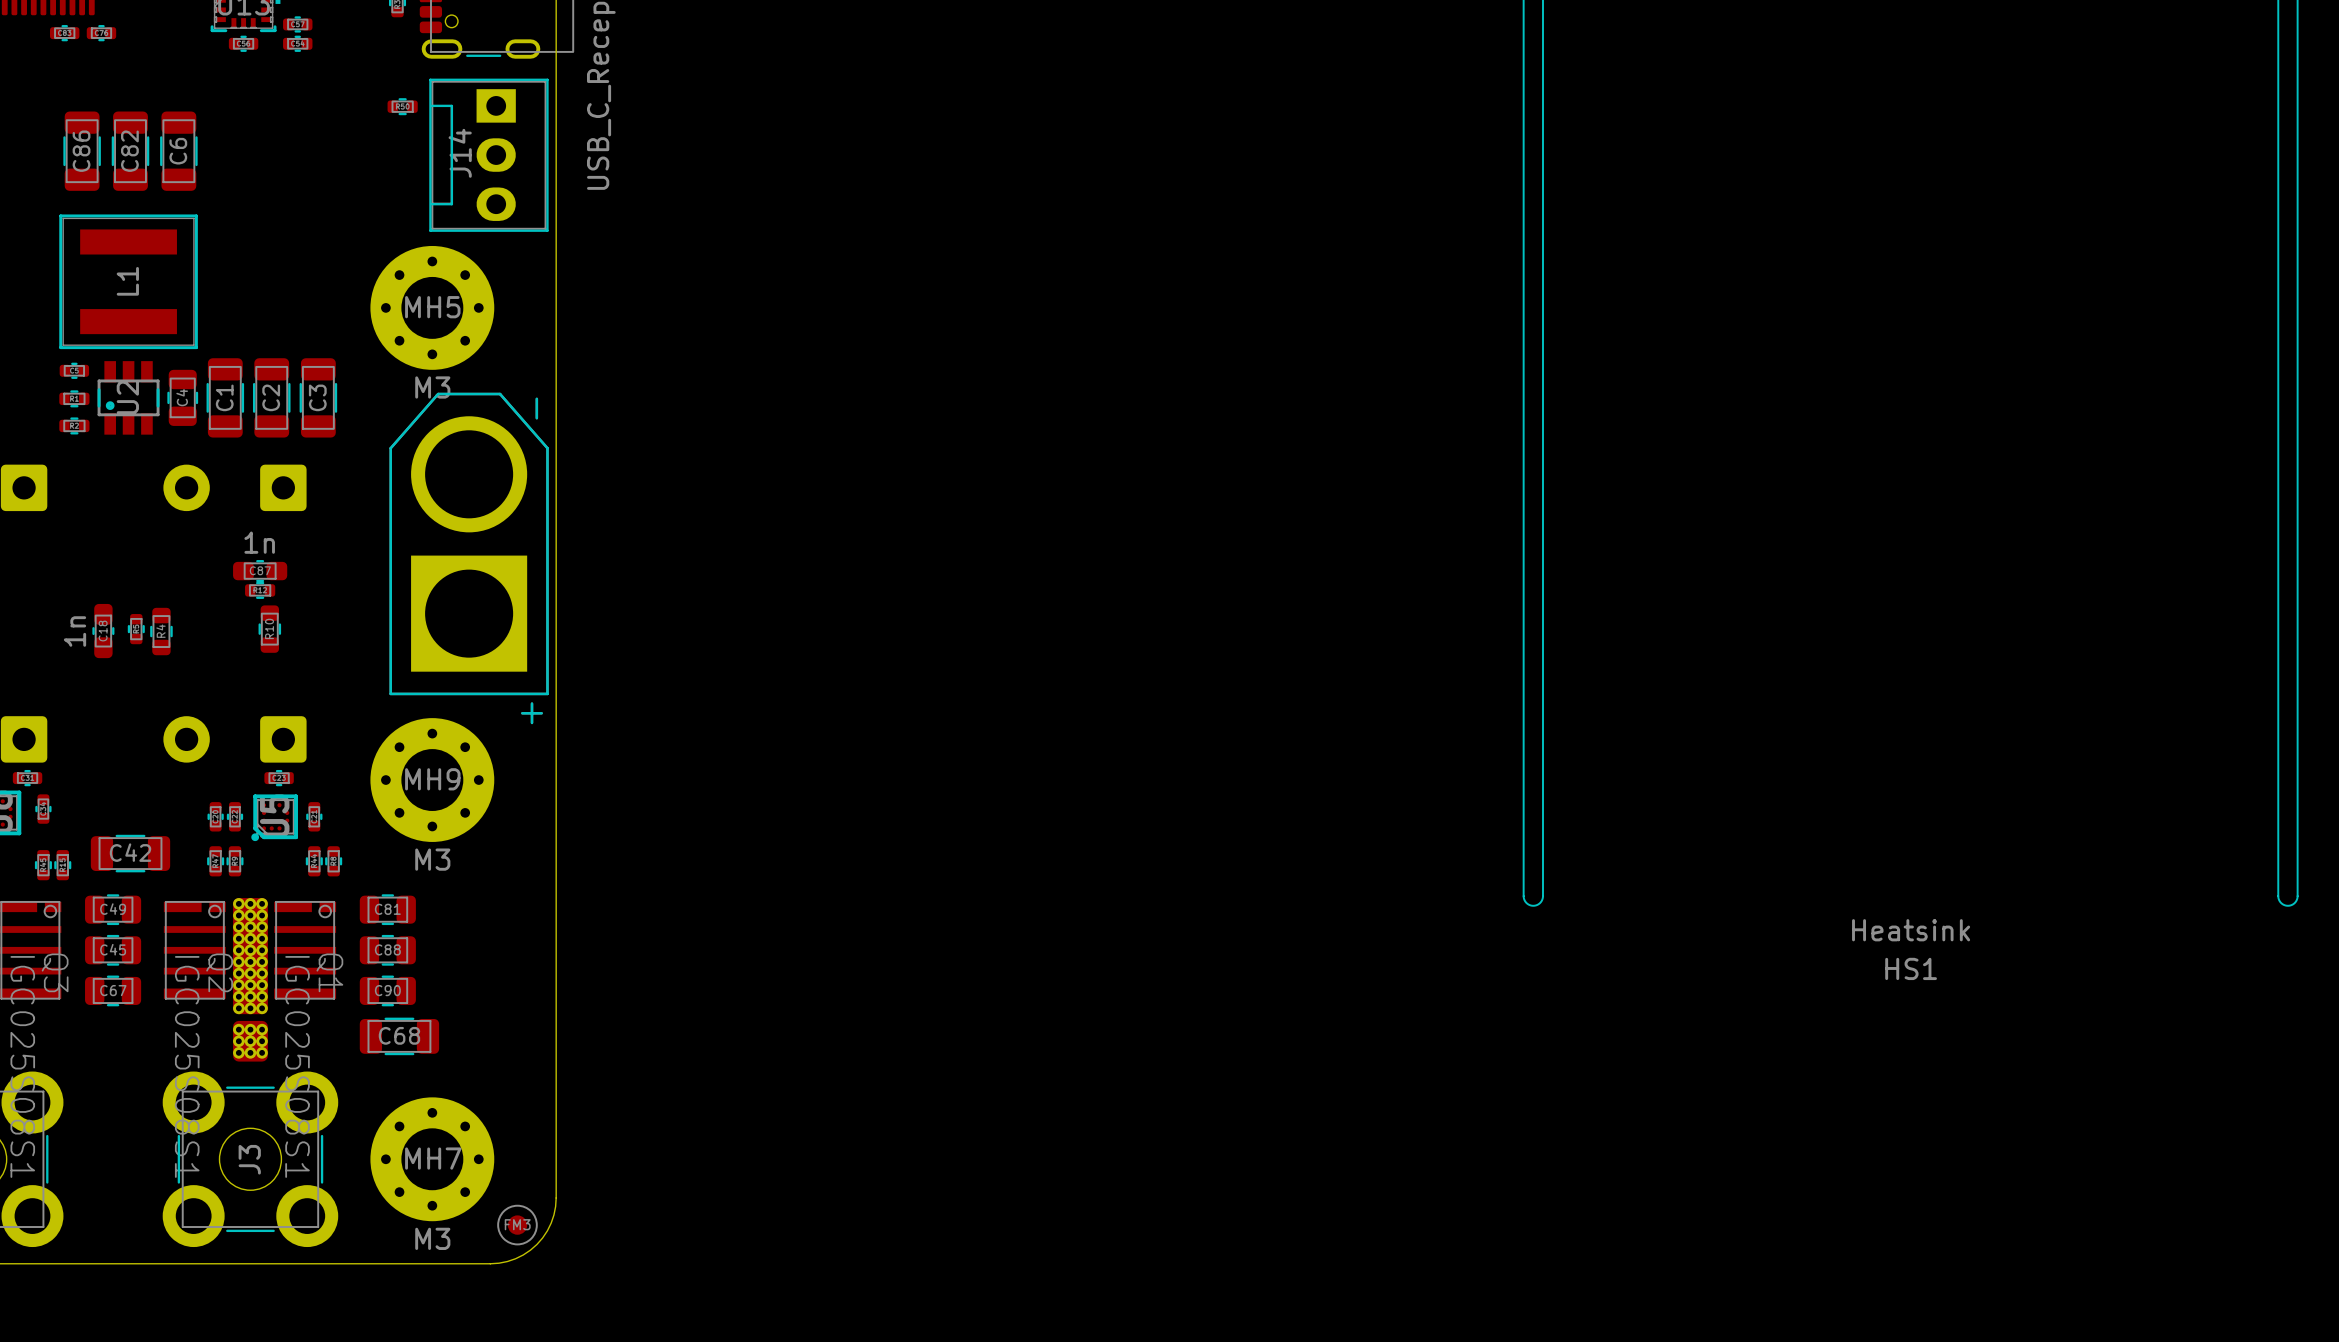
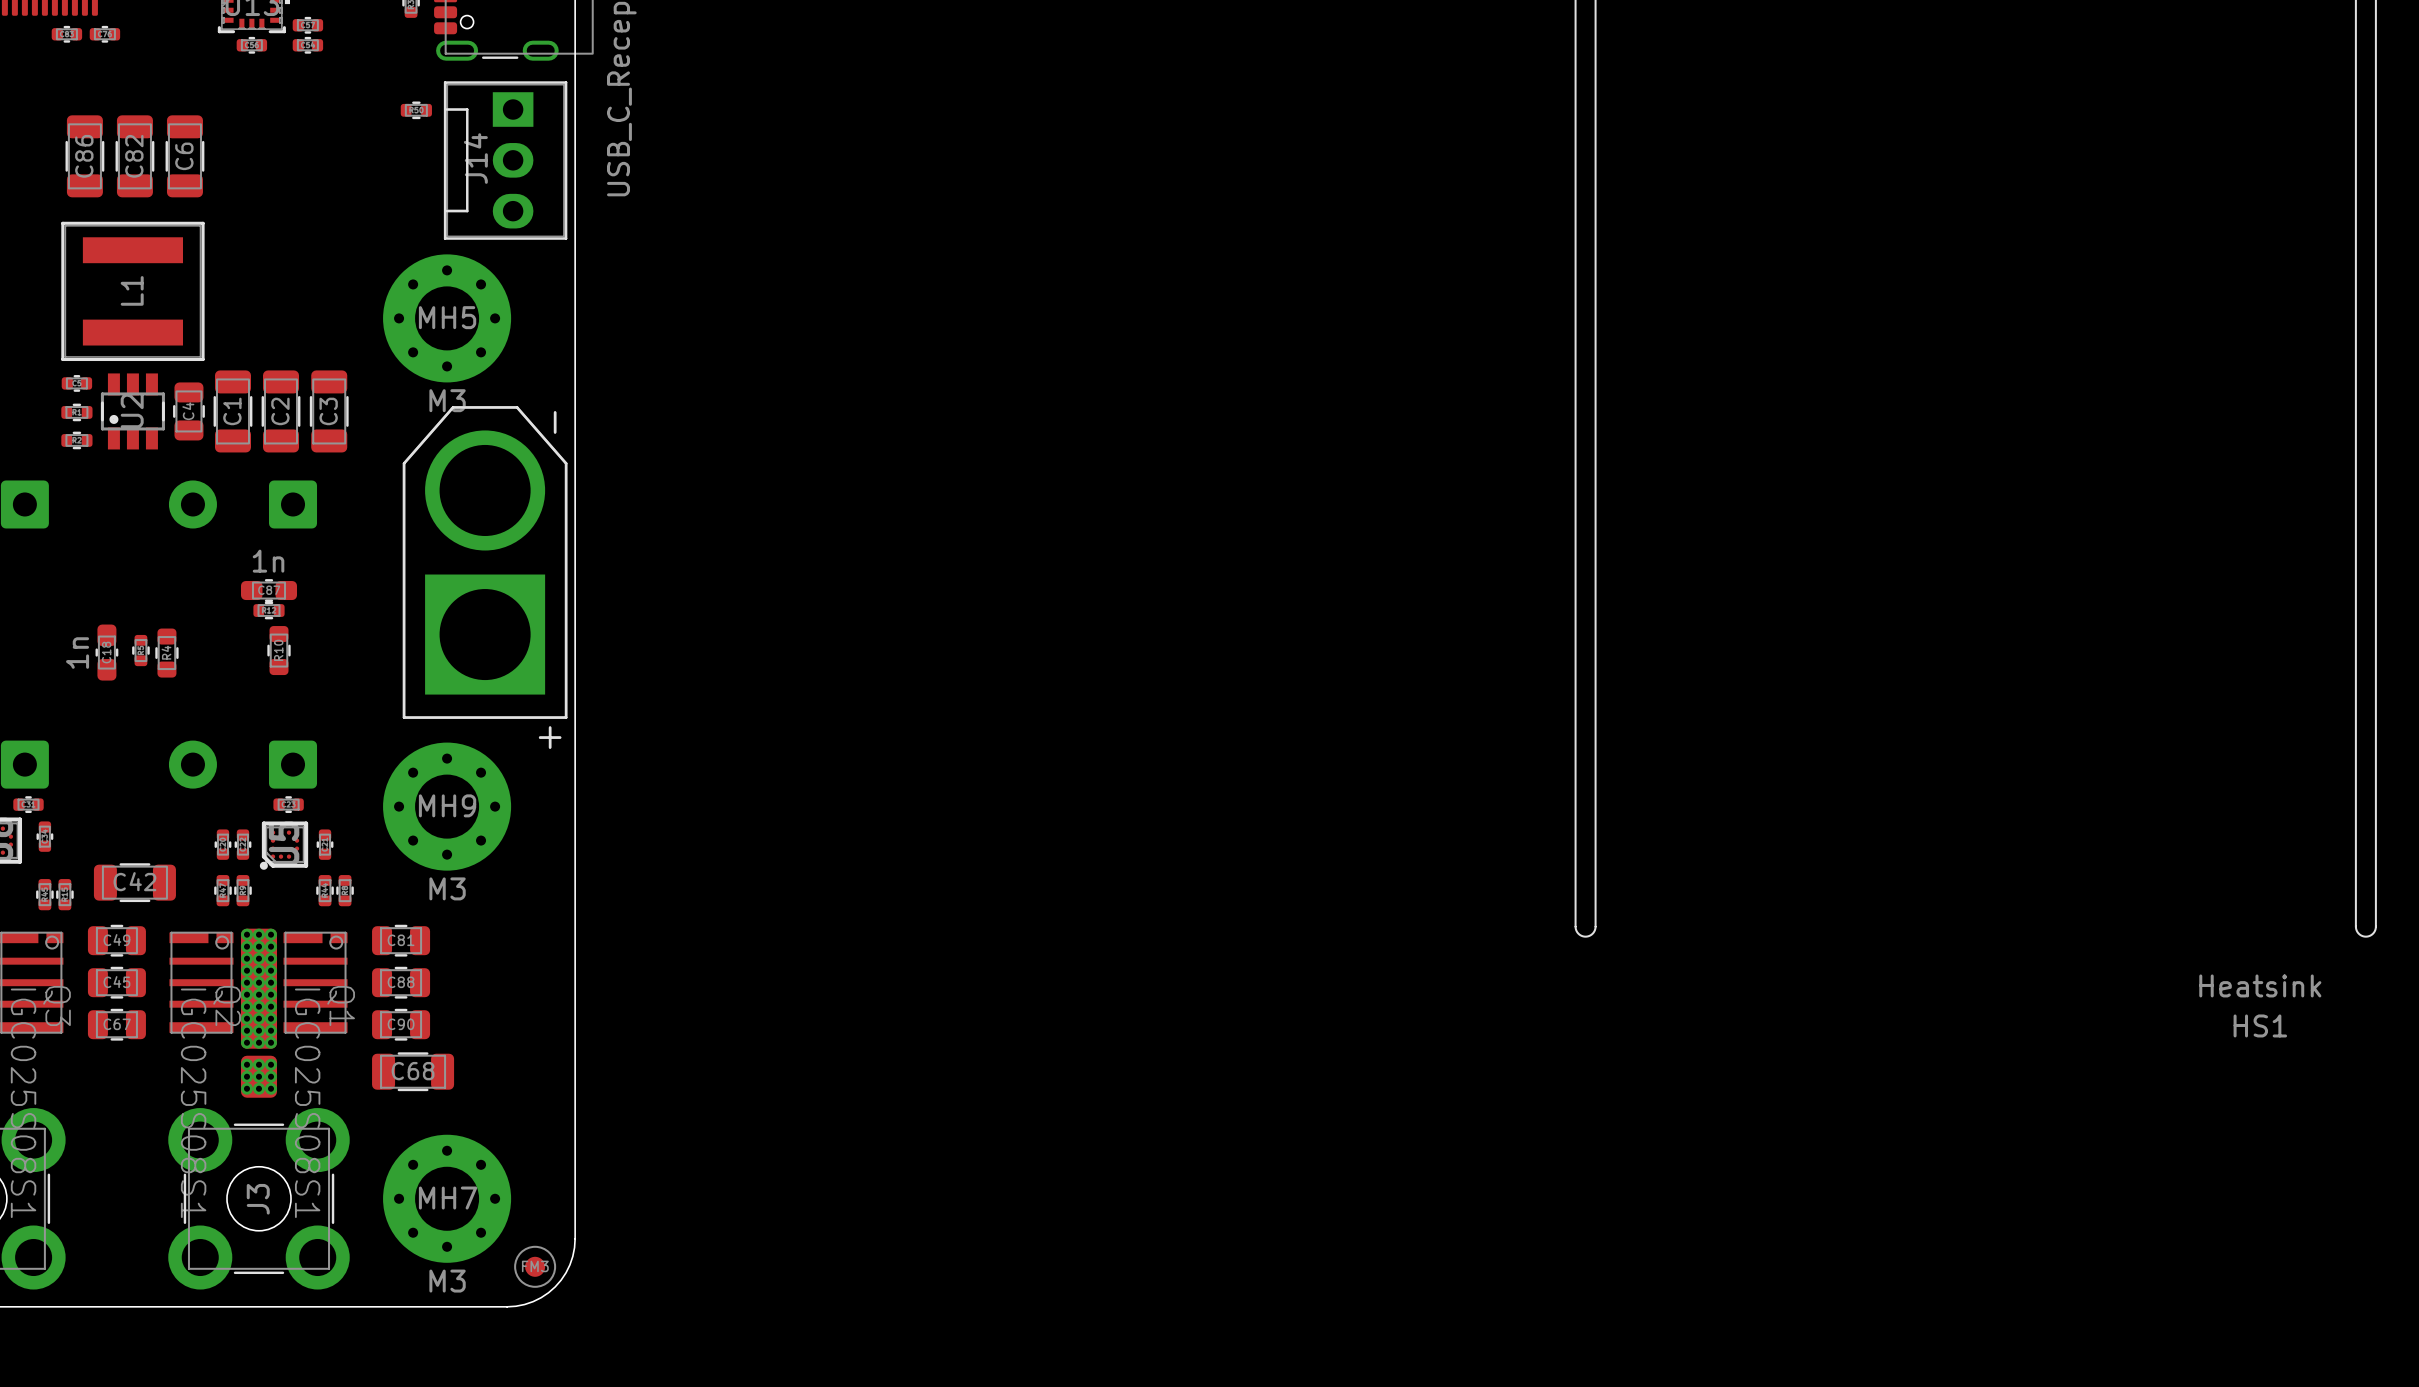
HS1 position: (1911, 949) -> (2260, 1005)

